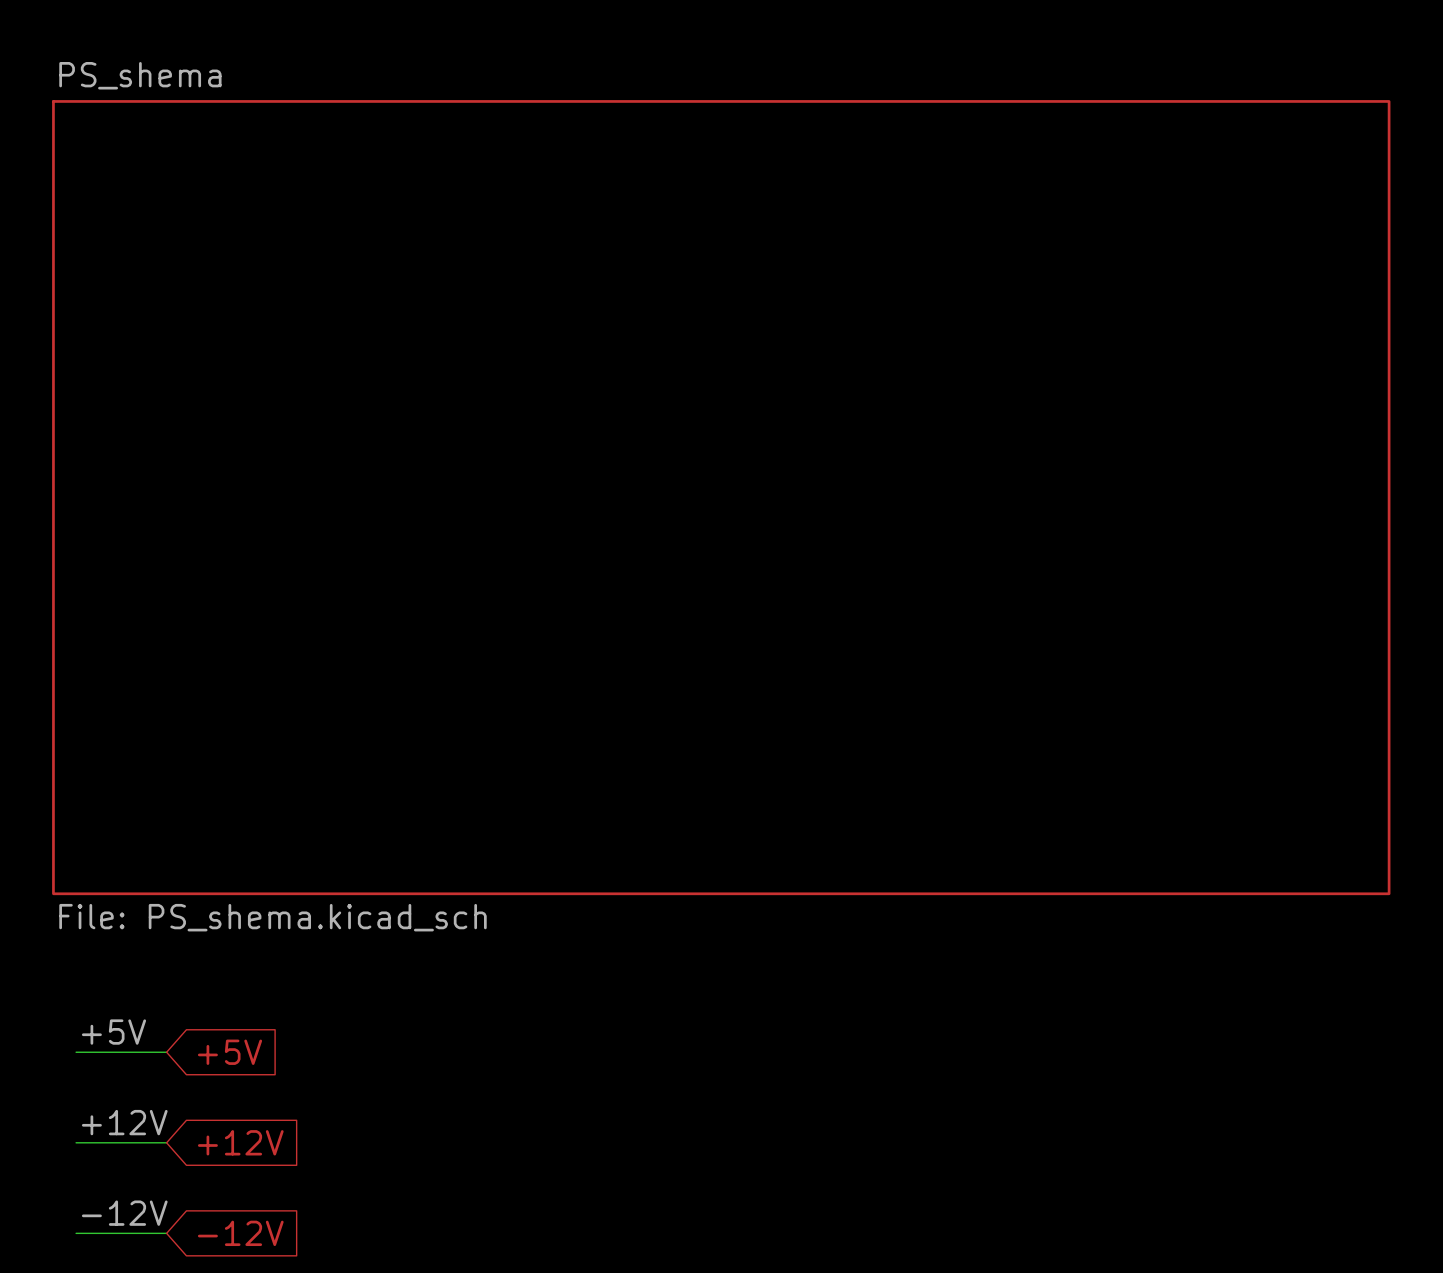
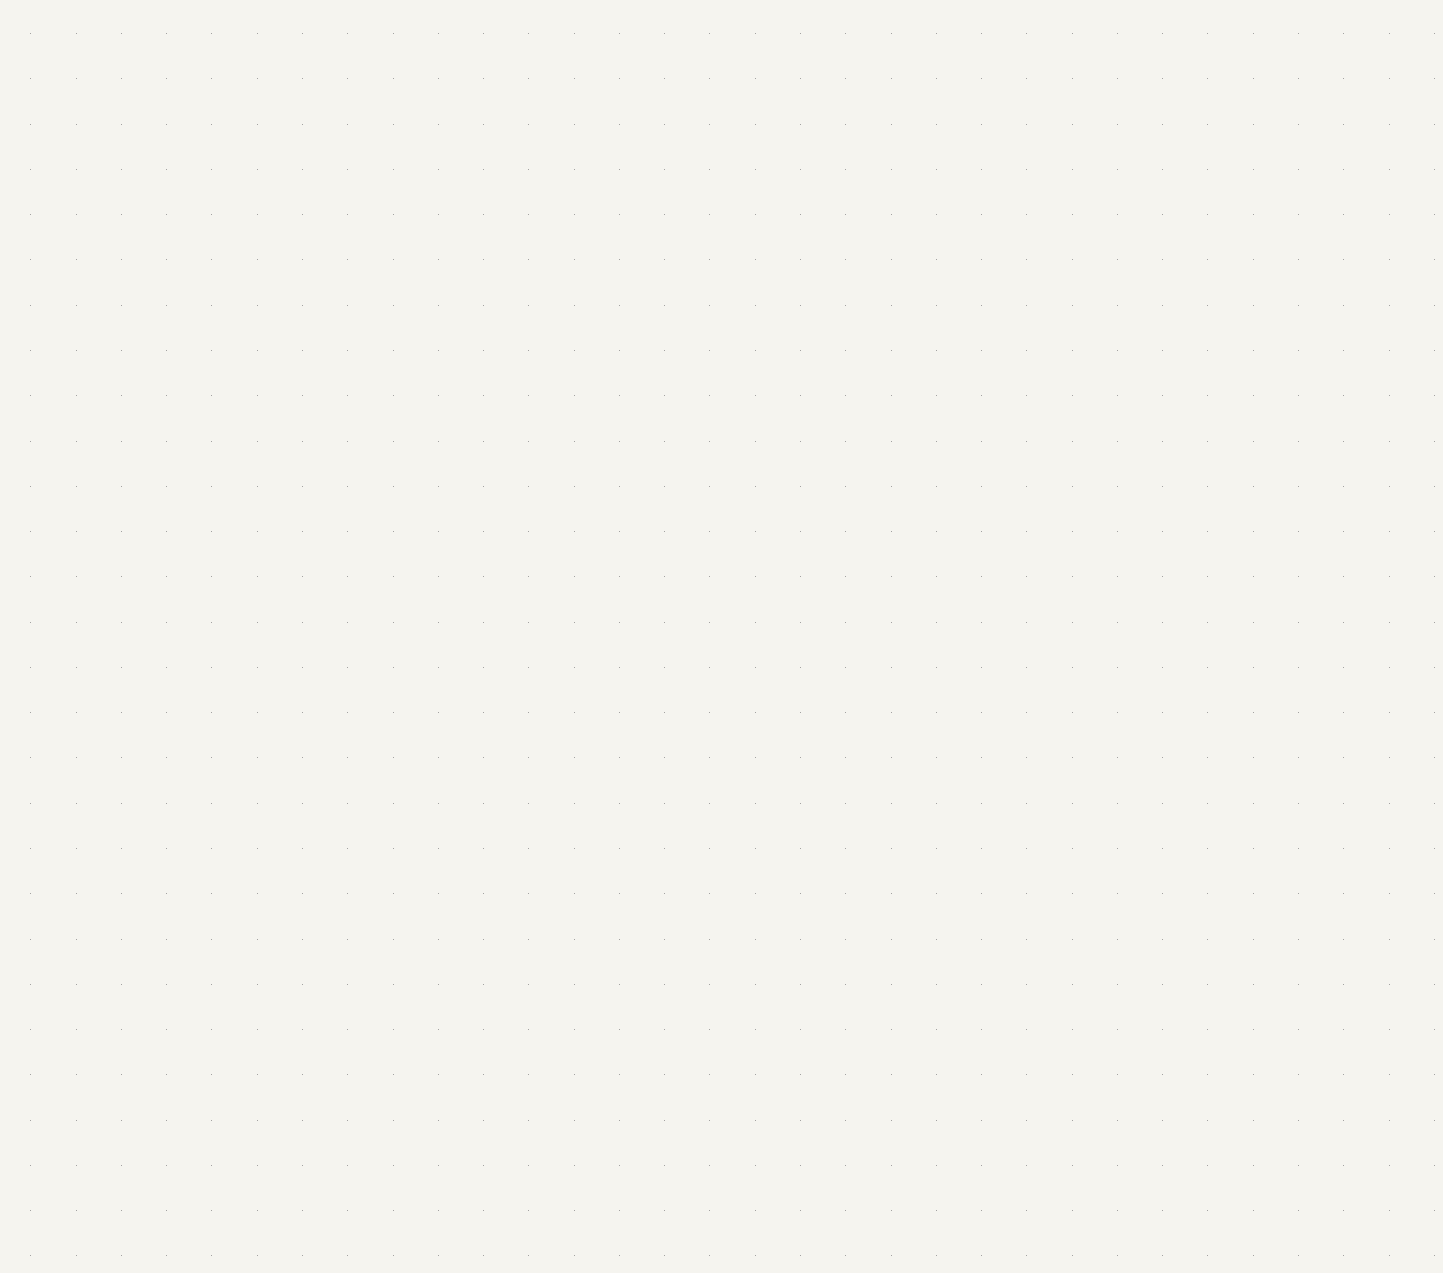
sheet PS_shema: File: PS_shema.kicad_sch (721, 497) -> none
label: +5V (113, 1032) -> none
wire: (76, 1052) (166, 1052) -> none
global label: +5V (230, 1052) -> none
label: +12V (124, 1122) -> none
wire: (76, 1142) (166, 1142) -> none
global label: +12V (240, 1142) -> none
label: -12V (124, 1213) -> none
wire: (76, 1233) (166, 1233) -> none
global label: -12V (240, 1233) -> none

